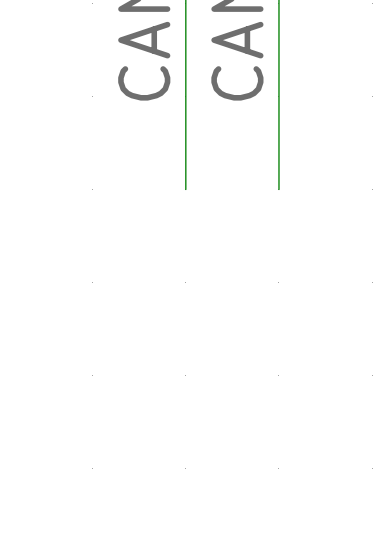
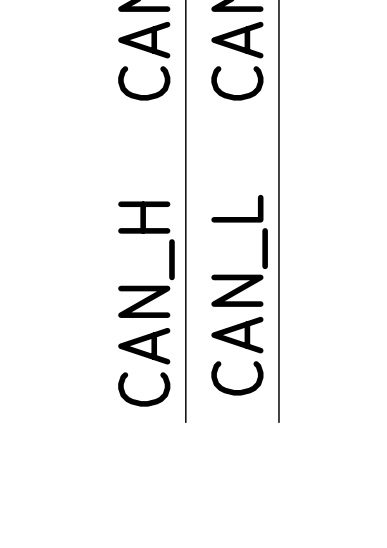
wire: none -> (185, 189) (185, 422)
wire: none -> (278, 189) (278, 422)
label: none -> CAN_L (239, 295)
label: none -> CAN_H (146, 304)

